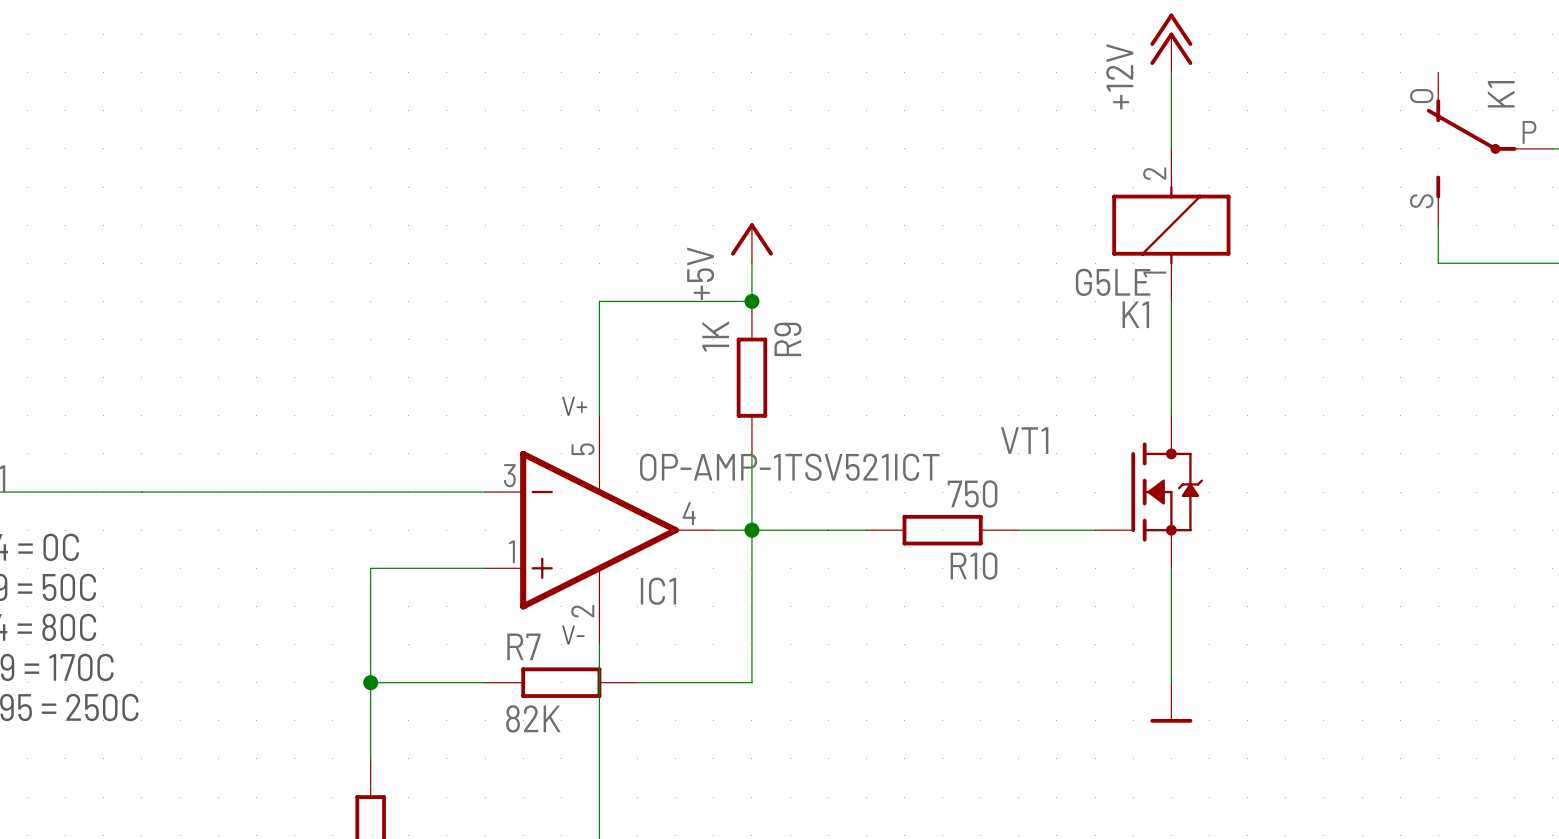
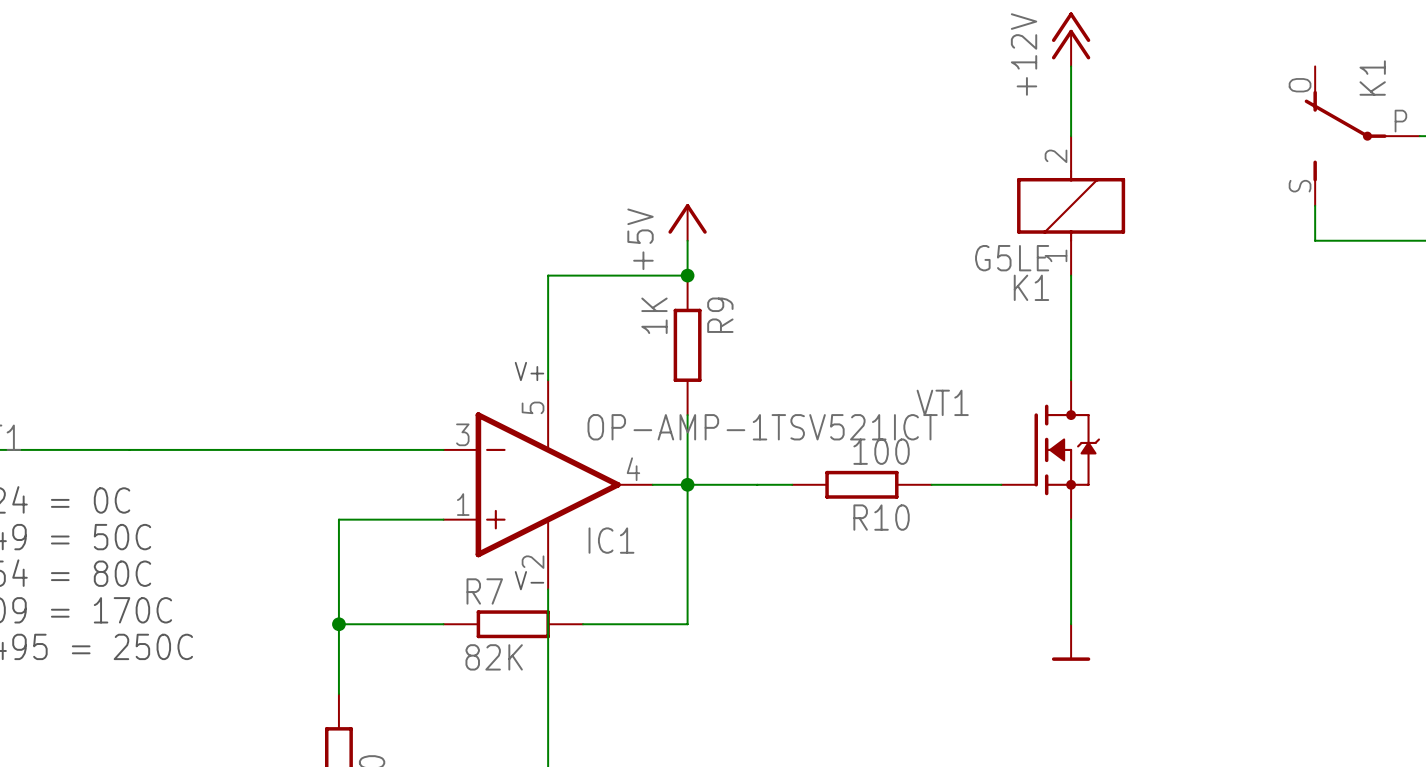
R10 value: 750 (972, 493) -> 100 (881, 451)

